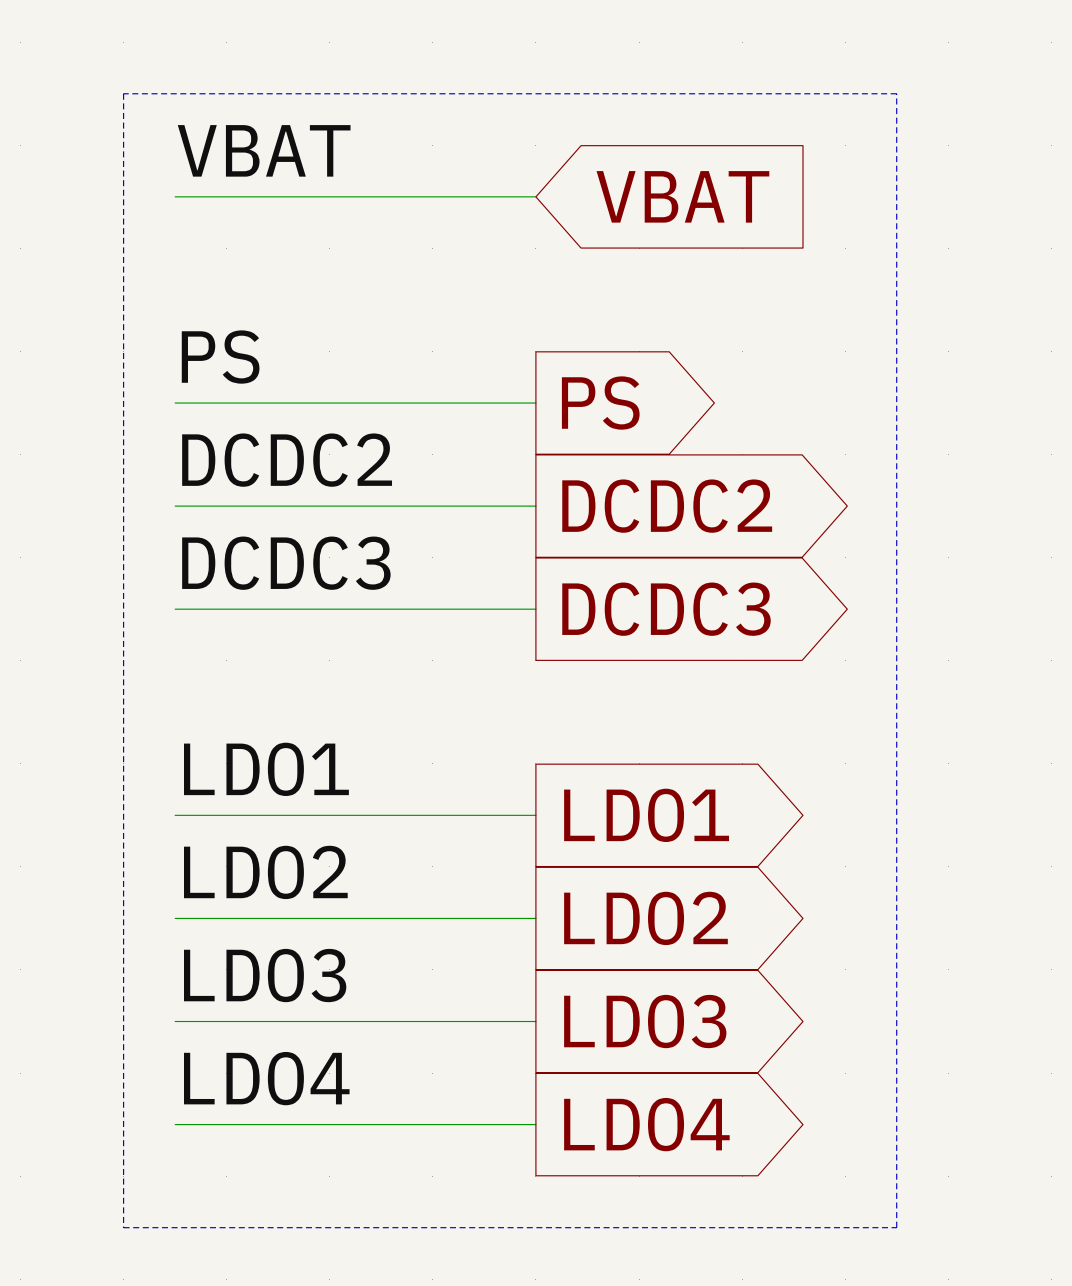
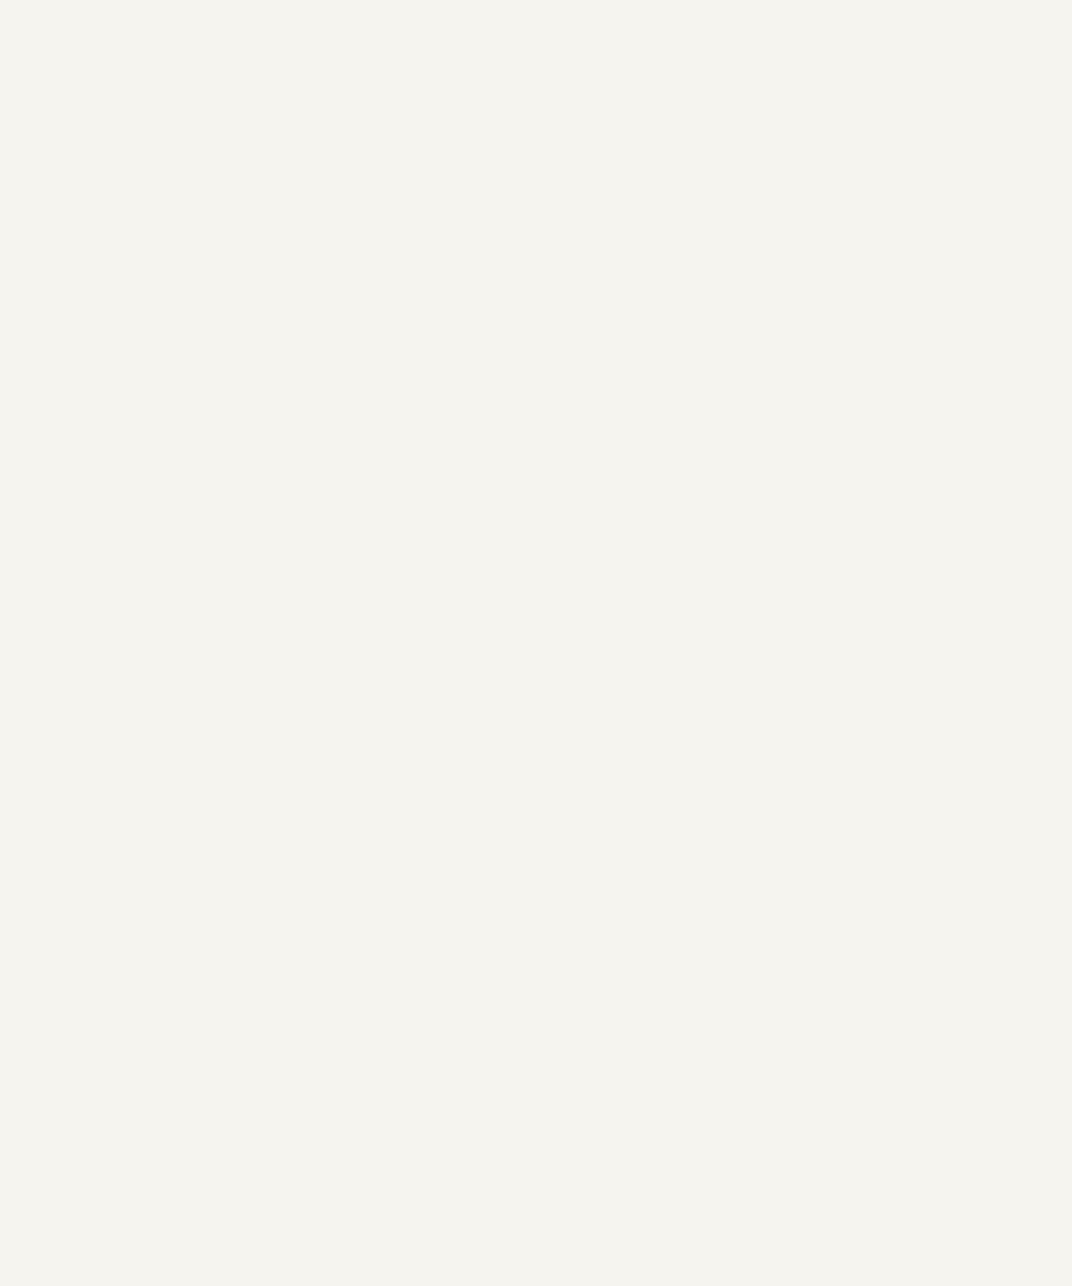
line: (123, 93) (123, 1227) (896, 1227) (896, 93) (123, 93) -> none
label: VBAT (264, 150) -> none
wire: (175, 196) (535, 196) -> none
global label: VBAT (682, 196) -> none
label: PS (220, 357) -> none
wire: (175, 403) (535, 403) -> none
global label: PS (600, 403) -> none
label: DCDC2 (287, 460) -> none
wire: (175, 506) (535, 506) -> none
global label: DCDC2 (667, 506) -> none
label: DCDC3 (286, 563) -> none
wire: (175, 609) (535, 609) -> none
global label: DCDC3 (666, 609) -> none
label: LDO1 (266, 769) -> none
wire: (175, 815) (535, 815) -> none
global label: LDO1 (646, 815) -> none
label: LDO2 (265, 872) -> none
wire: (175, 918) (535, 918) -> none
global label: LDO2 (645, 918) -> none
label: LDO3 (265, 975) -> none
wire: (175, 1021) (535, 1021) -> none
global label: LDO3 (645, 1021) -> none
label: LDO4 (266, 1078) -> none
wire: (175, 1124) (535, 1124) -> none
global label: LDO4 (646, 1124) -> none

